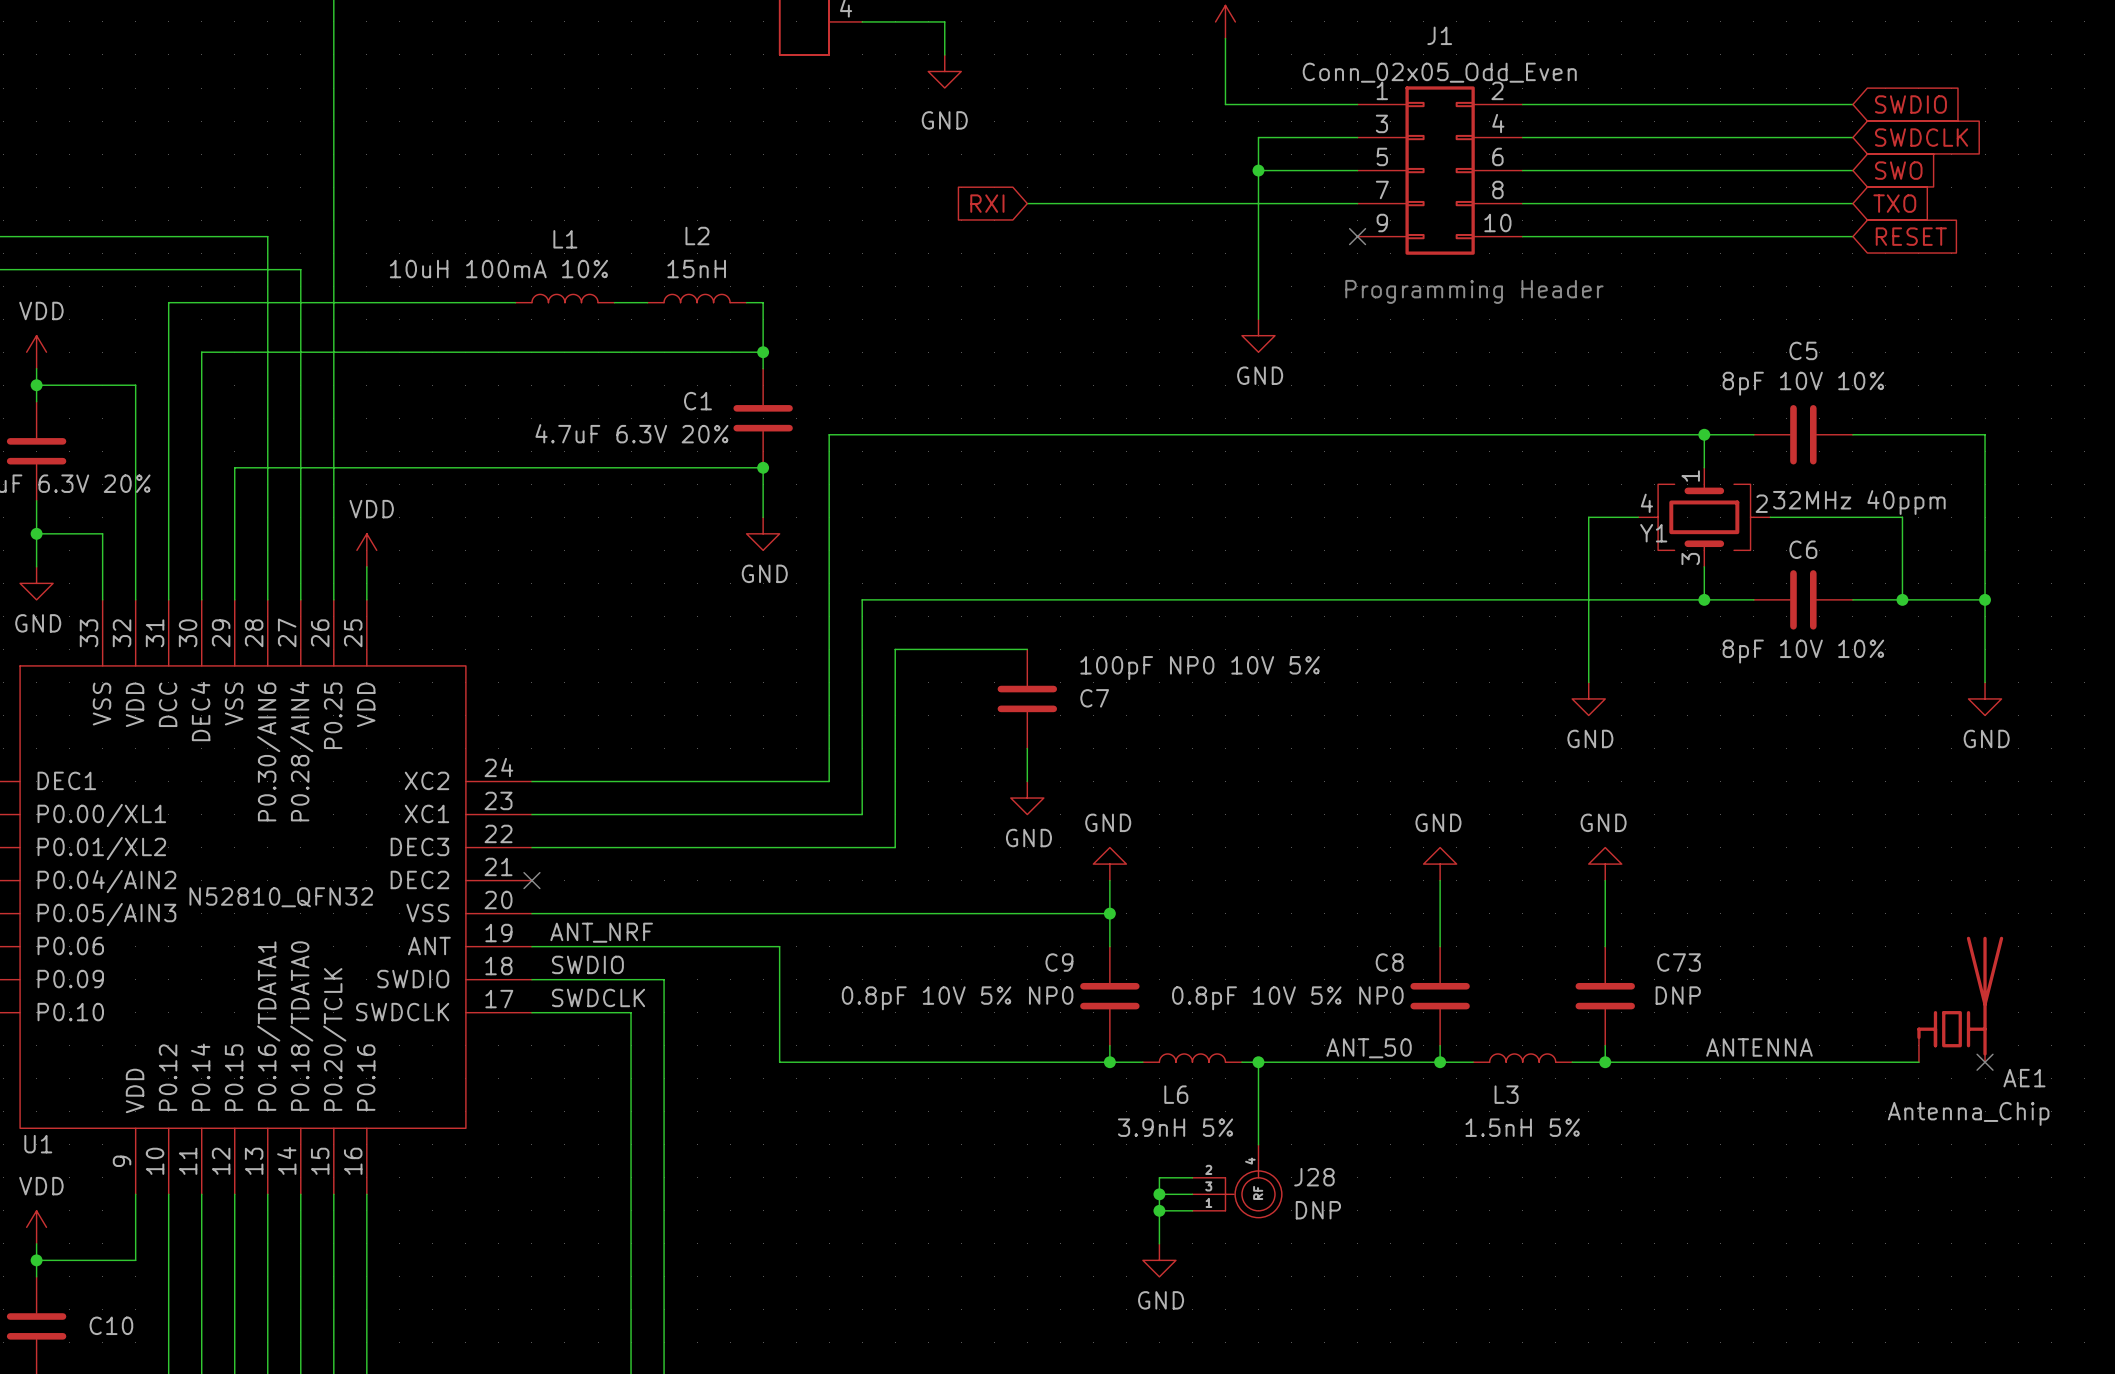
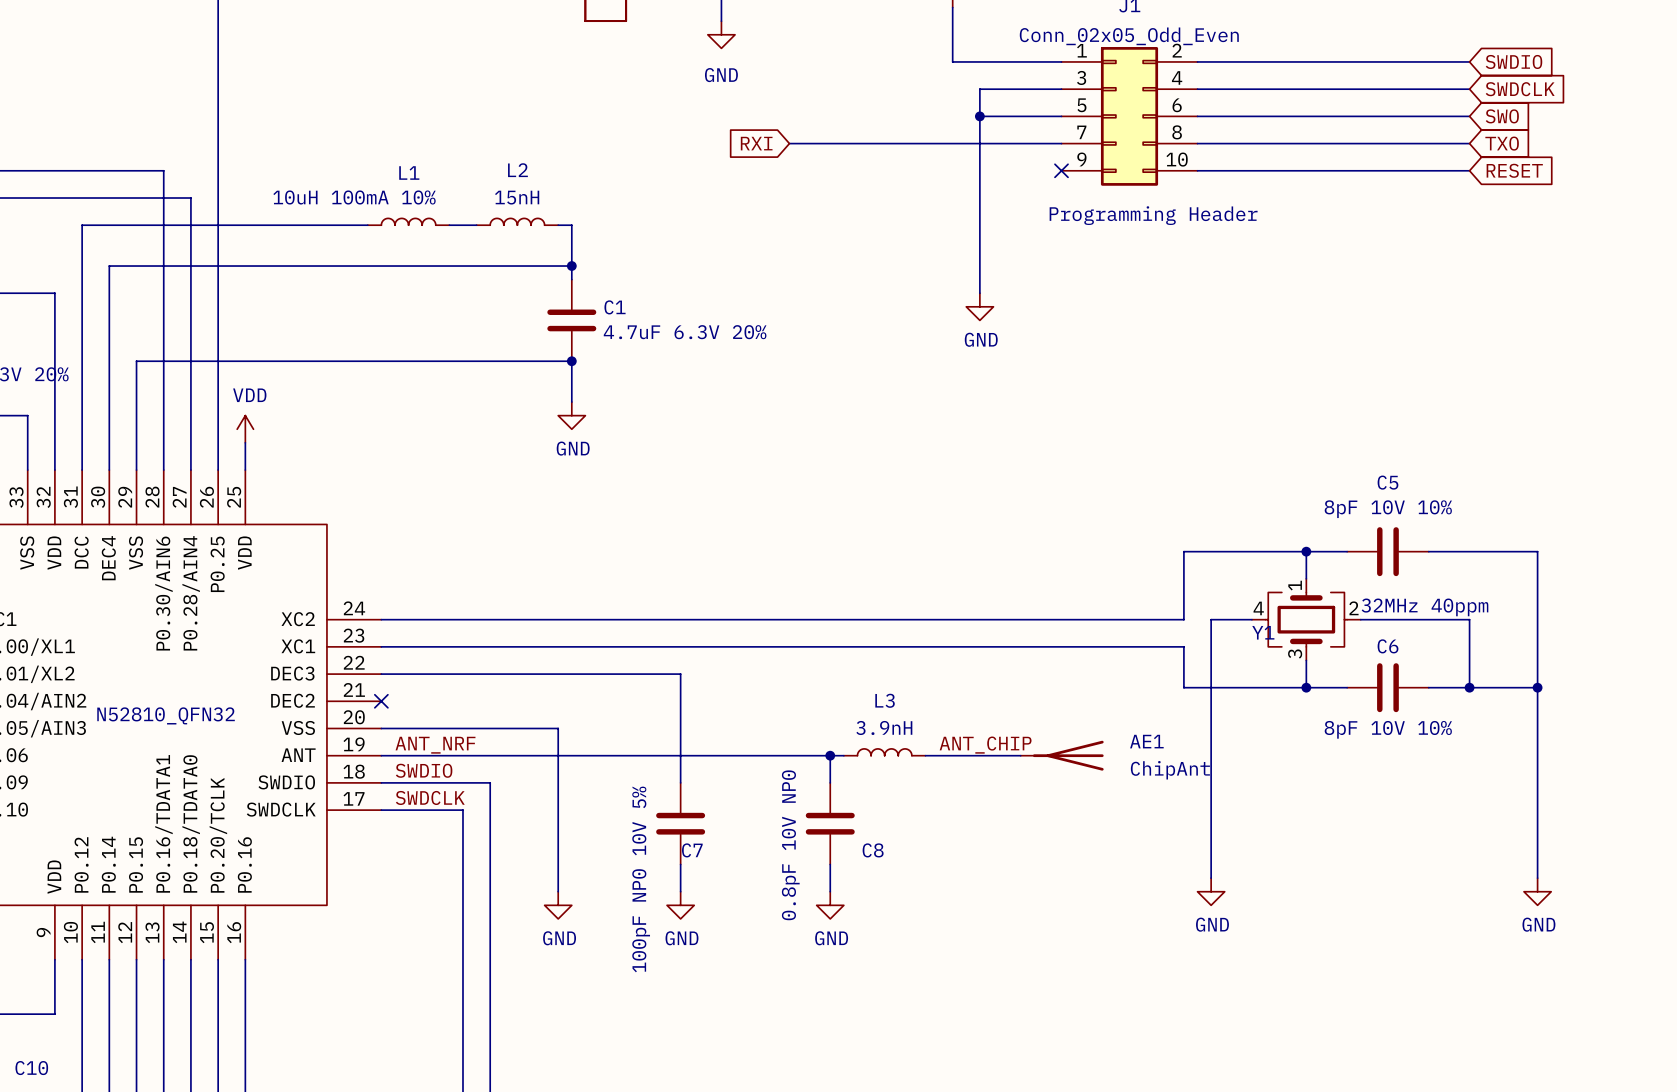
wire: none -> (979, 238) (979, 293)
power symbol position: GND (1258, 335) -> GND (979, 306)
C1 name position: C1 (697, 401) -> C1 (615, 307)
C1 value position: 4.7uF 6.3V 20% (631, 433) -> 4.7uF 6.3V 20% (685, 332)
wire: (1704, 434) (1704, 467) -> (1306, 551) (1306, 578)
junction: (1704, 434) -> none
wire: (1753, 434) (829, 434) (829, 781) -> (1347, 551) (1183, 551) (1183, 619) (626, 619)
C5 position: (1803, 434) -> (1387, 551)
wire: (1852, 434) (1985, 434) (1985, 682) -> none
wire: (1638, 517) (1588, 517) (1588, 682) -> none
Y1 position: (1704, 517) -> (1306, 619)
wire: (1770, 517) (1902, 517) (1902, 599) -> (1360, 619) (1469, 619) (1469, 687)
wire: (1704, 566) (1704, 599) -> (1306, 660) (1306, 687)
junction: (1704, 599) -> none
wire: (1753, 599) (862, 599) (862, 814) -> (1347, 687) (1183, 687) (1183, 646) (653, 646)
C6 position: (1803, 599) -> (1387, 687)
wire: (1852, 599) (1985, 599) -> (1428, 687) (1537, 687)
junction: (1902, 599) -> none
junction: (1985, 599) -> none
wire: (1027, 649) (895, 649) (895, 847) -> (680, 782) (680, 674)
C7 value rotation: 0° (1200, 668) -> 90° counterclockwise (641, 879)
C7 position: (1027, 698) -> (680, 823)
C7 name position: C7 (1094, 698) -> C7 (692, 850)
power symbol: GND (1588, 698) -> none
junction: none -> (1306, 551)
wire: none -> (1428, 551) (1537, 551) (1537, 878)
power symbol: GND (1985, 698) -> none
wire: (1027, 748) (1027, 781) -> (830, 755) (830, 782)
wire: none -> (1251, 619) (1211, 619) (1211, 878)
power symbol: GND (1027, 798) -> none
power symbol: GND (1109, 864) -> none
power symbol: GND (1440, 864) -> none
power symbol: GND (1605, 864) -> none
junction: none -> (1306, 687)
junction: none -> (1469, 687)
junction: none -> (1537, 687)
wire: (1109, 880) (1109, 946) -> none
wire: (1440, 880) (1440, 946) -> none
wire: (1605, 880) (1605, 946) -> none
wire: (746, 913) (1109, 913) -> (558, 728) (558, 891)
junction position: (1109, 913) -> (830, 755)
label: none -> ANT_CHIP (985, 745)
AE1 symbol: [1917, 936, 2004, 1063] -> [1020, 740, 1104, 771]
wire: (779, 946) (779, 1062) (1142, 1062) -> (585, 755) (843, 755)
wire: none -> (925, 755) (1020, 755)
C8 name position: C8 (1389, 962) -> C8 (873, 850)
C9: 0.8pF 10V 5% NP0 (1109, 996) -> none
C8 position: (1440, 996) -> (830, 823)
C73: DNP (1605, 996) -> none
C8 value: 0.8pF 10V 5% NP0 (1287, 998) -> 0.8pF 10V NP0 (790, 845)
wire: (1109, 1045) (1109, 1062) -> none
wire: (1440, 1045) (1440, 1062) -> none
wire: (1605, 1045) (1605, 1062) -> none
label: ANTENNA (1759, 1047) -> none
label: ANT_50 (1369, 1048) -> none
L6: 3.9nH 5% (1192, 1058) -> none
L3 position: (1522, 1058) -> (884, 752)
junction: (1109, 1062) -> none
wire: (1241, 1062) (1473, 1062) -> none
wire: (1258, 1062) (1258, 1144) -> none
junction: (1258, 1062) -> none
junction: (1440, 1062) -> none
wire: (1572, 1062) (1918, 1062) -> none
junction: (1605, 1062) -> none
no-connect mark: (1985, 1062) -> none
wire: none -> (680, 864) (680, 891)
wire: none -> (830, 864) (830, 891)
AE1 name position: AE1 (2024, 1078) -> AE1 (1146, 741)
L3 name position: L3 (1506, 1094) -> L3 (885, 700)
power symbol: none -> GND (1211, 891)
power symbol: none -> GND (1537, 891)
AE1 value: Antenna_Chip (1968, 1113) -> ChipAnt (1170, 770)
L3 value: 1.5nH 5% (1522, 1127) -> 3.9nH (884, 727)
power symbol: none -> GND (558, 905)
power symbol: none -> GND (680, 905)
power symbol: none -> GND (830, 905)
wire: (1192, 1177) (1159, 1177) (1159, 1243) -> none
J28: DNP (1237, 1181) -> none
wire: (1159, 1194) (1192, 1194) -> none
junction: (1159, 1194) -> none
wire: (1159, 1210) (1192, 1210) -> none
junction: (1159, 1210) -> none
power symbol: GND (1159, 1260) -> none

